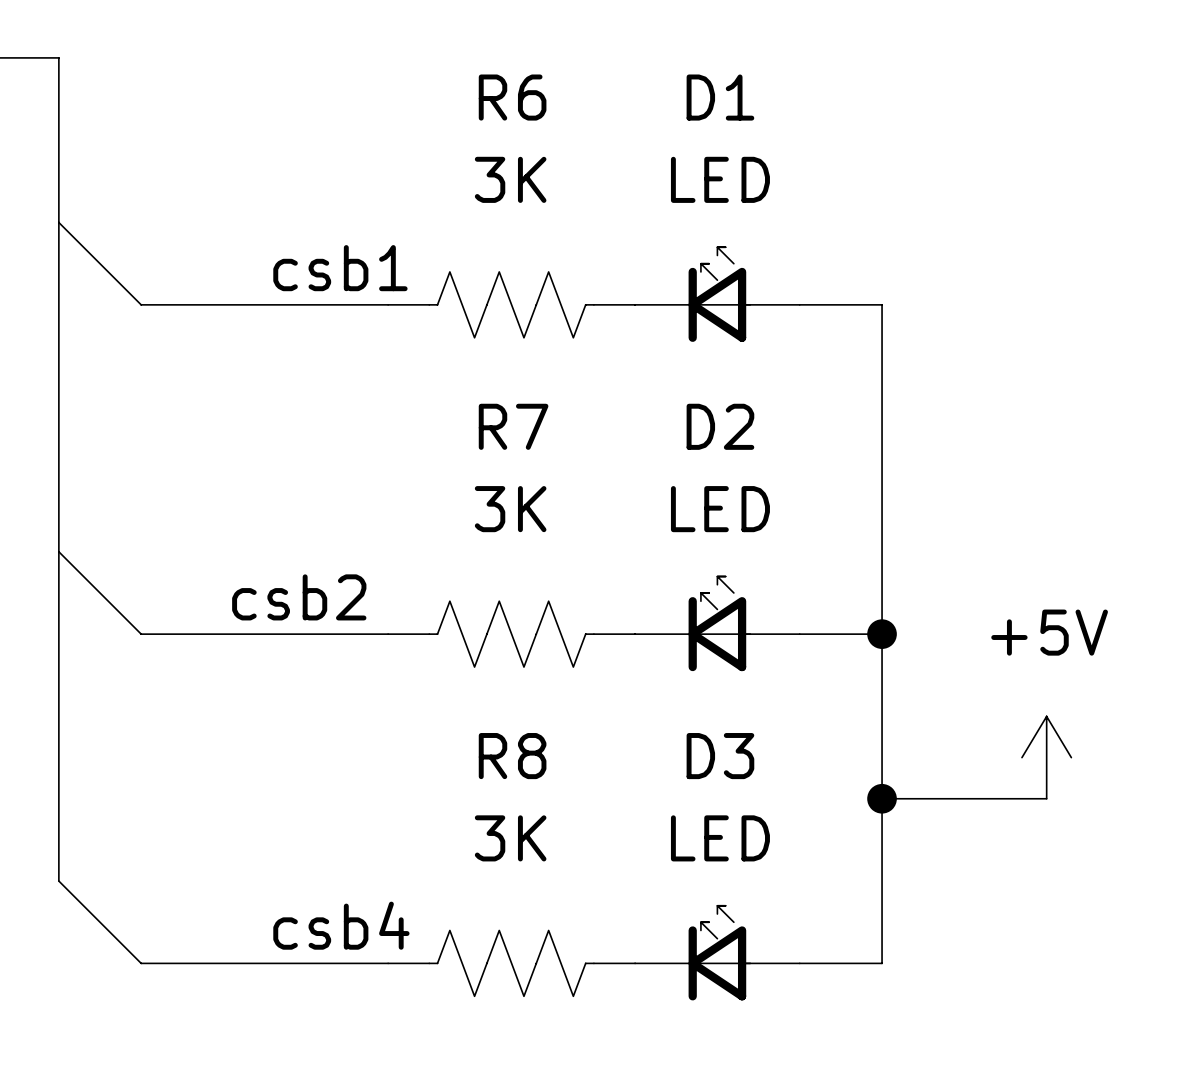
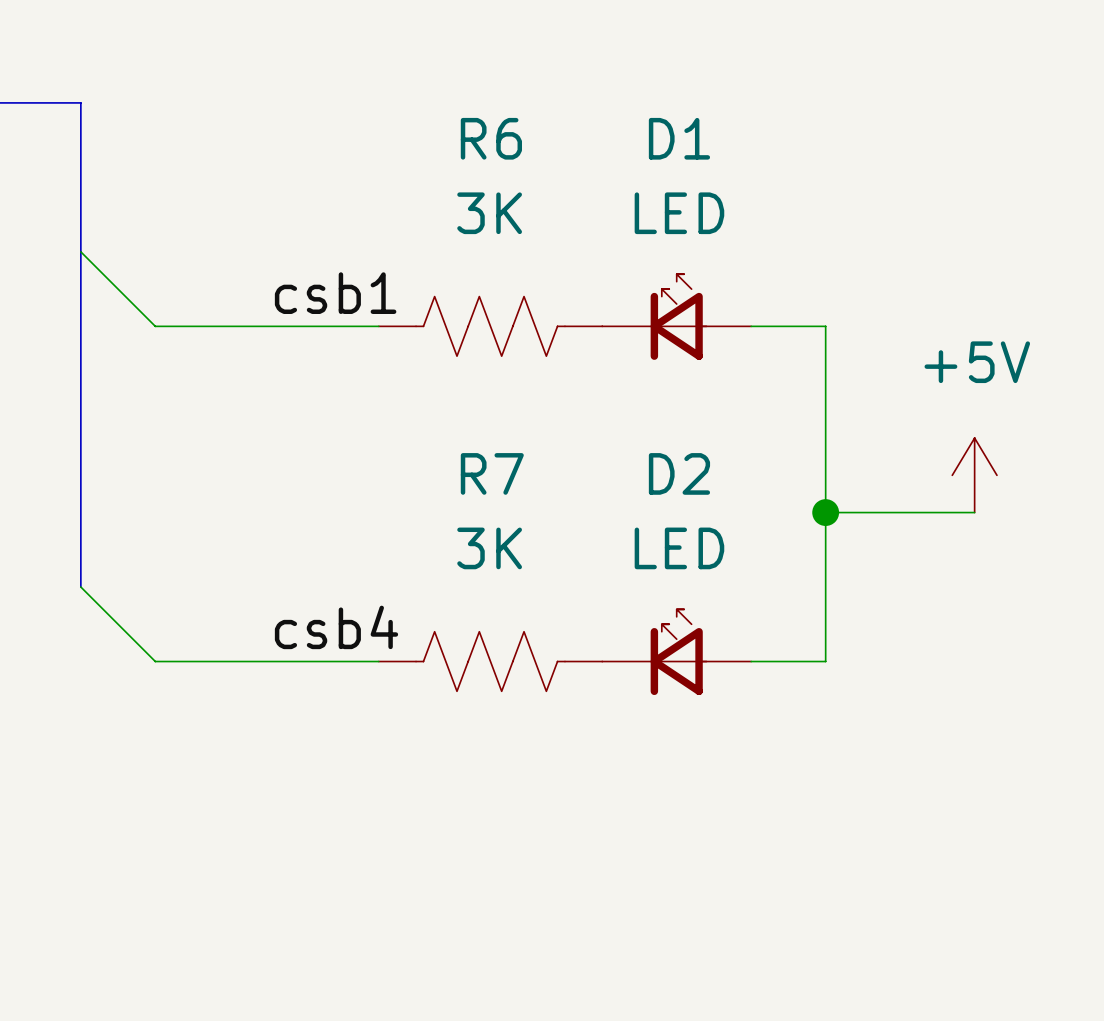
wire: (58, 551) (141, 634) (388, 634) -> (80, 587) (155, 661) (378, 661)
bus: (58, 592) (58, 881) -> none
label: csb2 (299, 597) -> none
D2 position: (717, 623) -> (676, 652)
R7 position: (511, 634) -> (490, 661)
wire: (799, 634) (882, 634) -> none
junction position: (882, 634) -> (825, 512)
wire: (882, 675) (882, 963) (799, 963) -> (825, 661) (751, 661)
power symbol position: +5V (1046, 757) -> +5V (974, 475)
wire: (882, 798) (1046, 798) -> (825, 512) (974, 512)
junction: (882, 798) -> none
wire: (58, 881) (141, 963) (388, 963) -> none
label position: csb4 (341, 925) -> csb4 (336, 627)
D3: LED (717, 953) -> none
R8: 3K (511, 963) -> none

